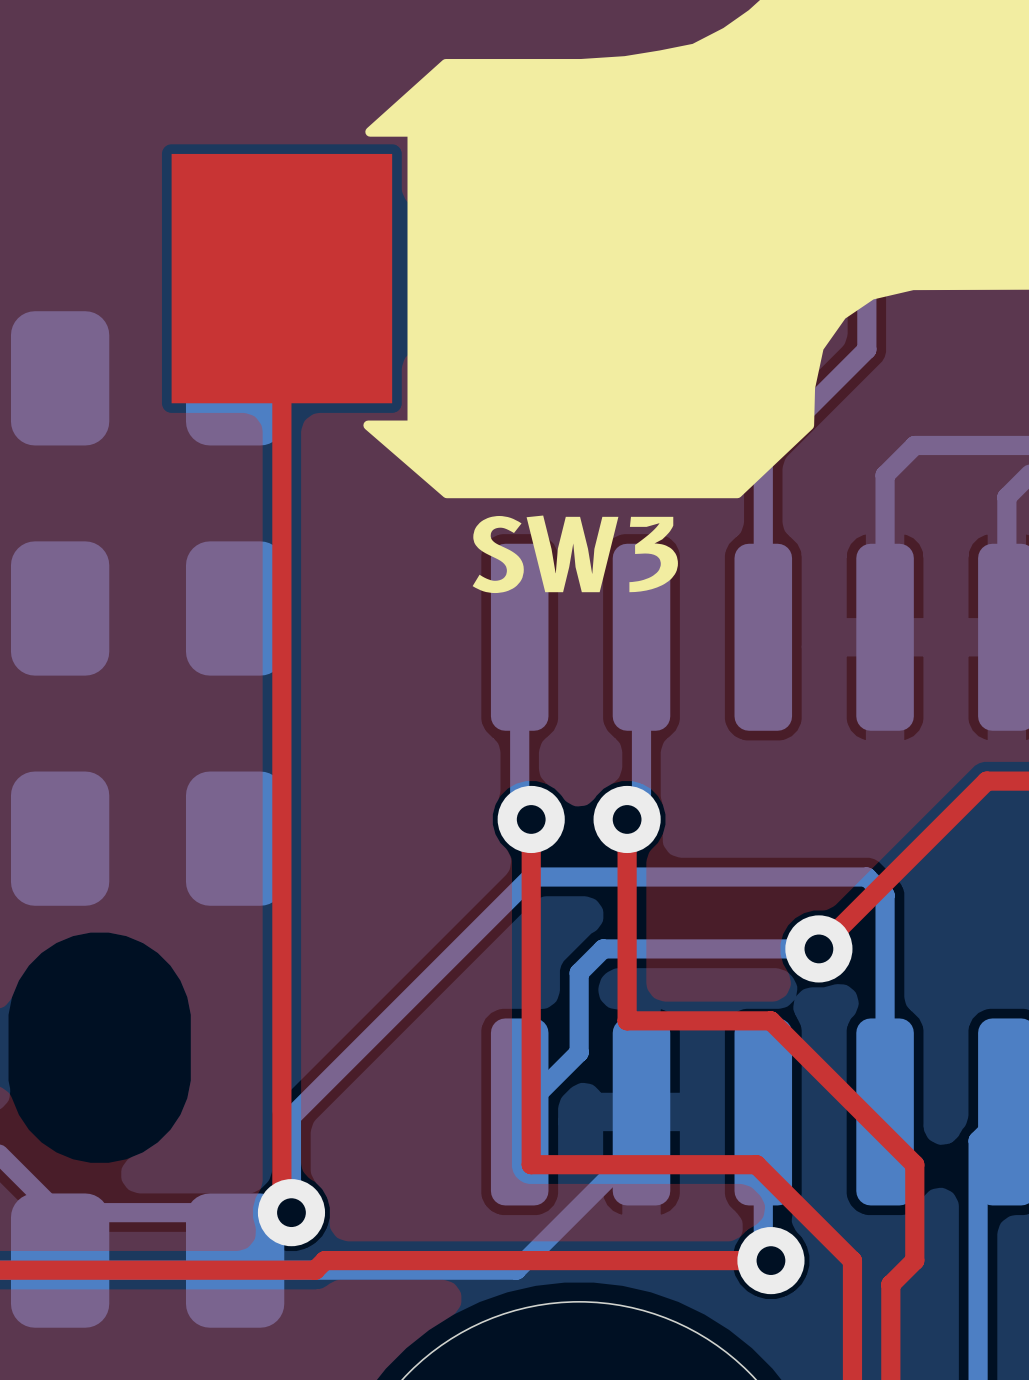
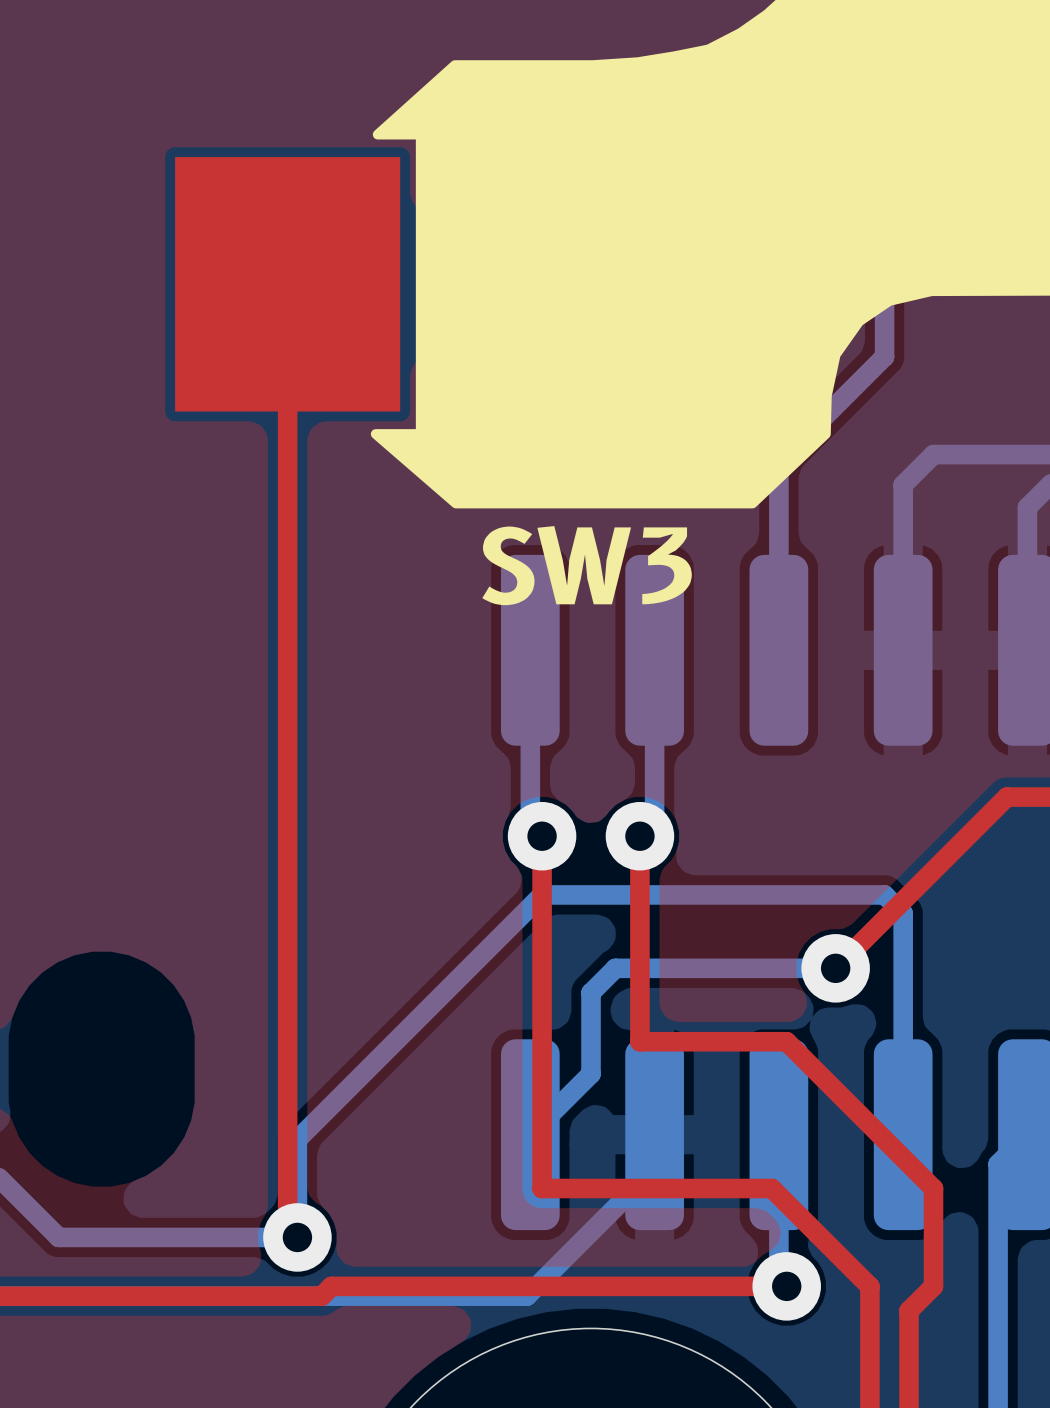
part: (147, 378) -> none
part: (147, 608) -> none
part: (147, 838) -> none
part: (147, 1260) -> none

